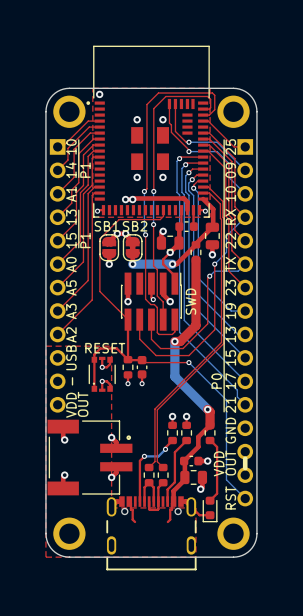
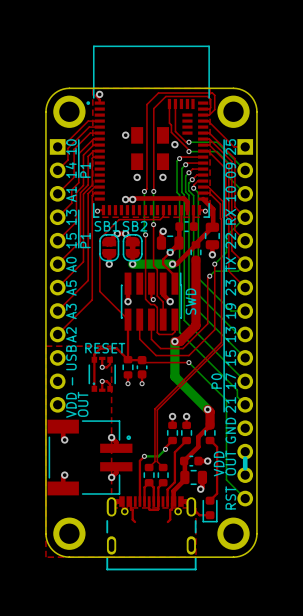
top track: none -> (95, 95) (99, 99) (99, 103)
via position: (137, 119) -> (125, 135)
via: (162, 119) -> none
via: none -> (174, 144)

